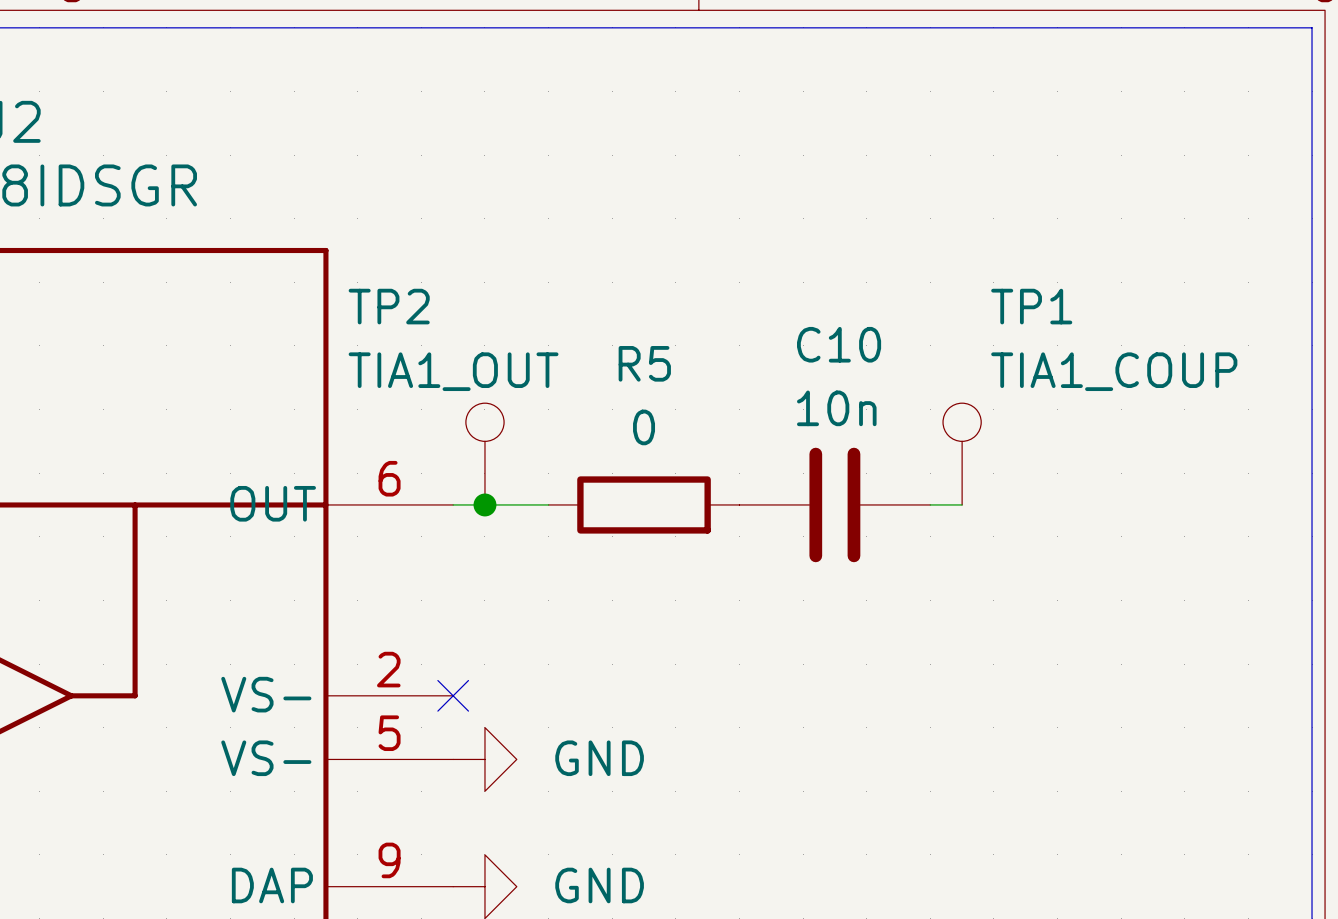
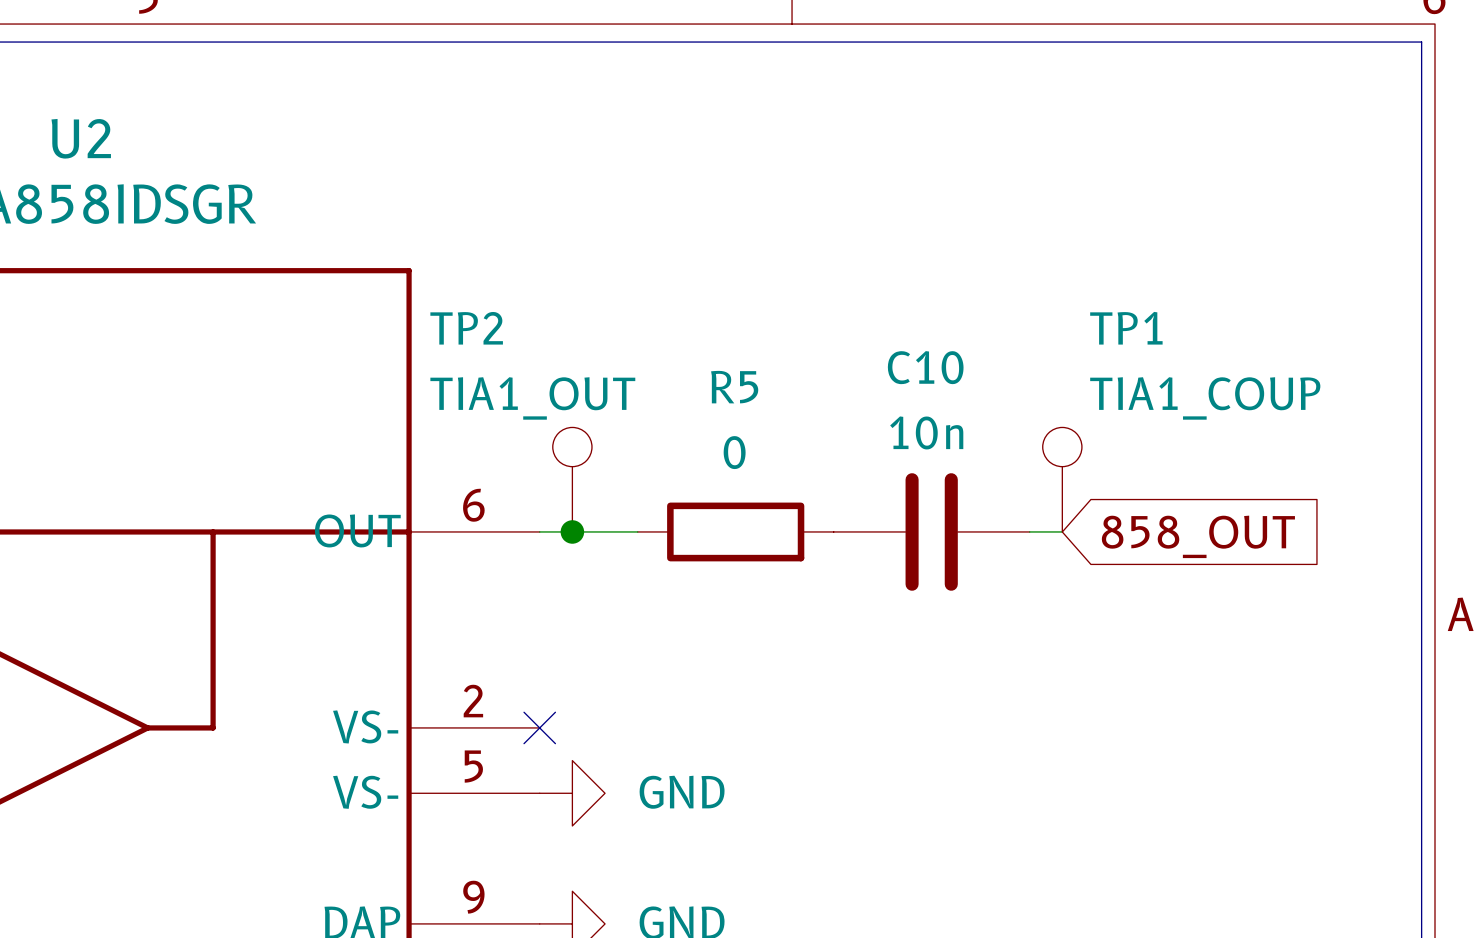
global label: none -> 858_OUT (1198, 536)

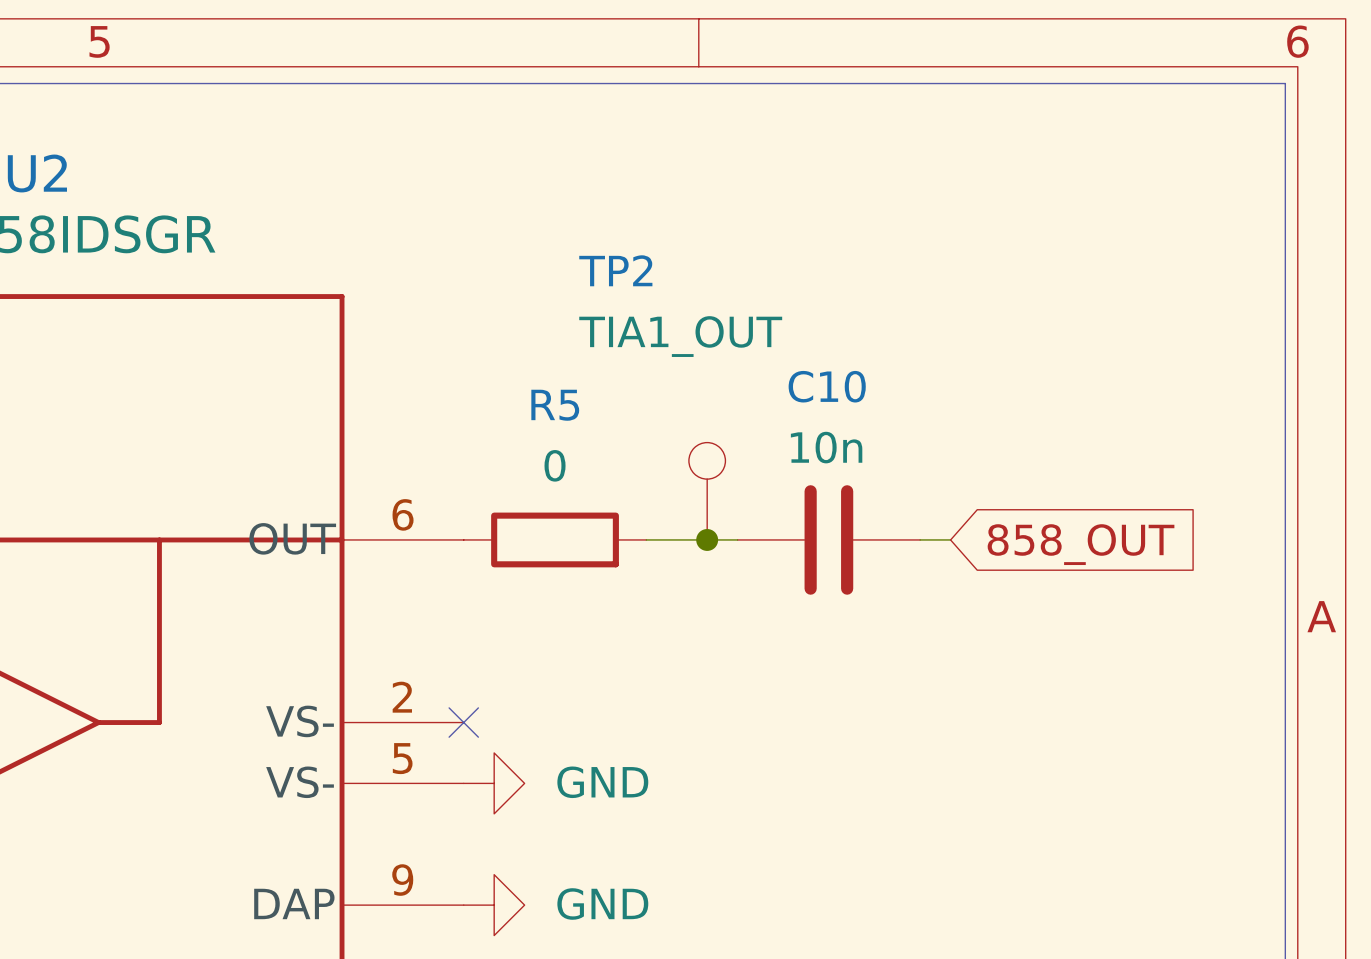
TP2 name position: TP2 (466, 328) -> TP2 (615, 270)
TP2 value position: TIA1_OUT (532, 398) -> TIA1_OUT (680, 336)
TP2 position: (572, 479) -> (707, 491)
TP1: TIA1_COUP (1062, 479) -> none
wire: (539, 531) (637, 531) -> (646, 539) (737, 539)
junction: (572, 531) -> none
R5 position: (735, 531) -> (555, 539)
junction: none -> (707, 539)

